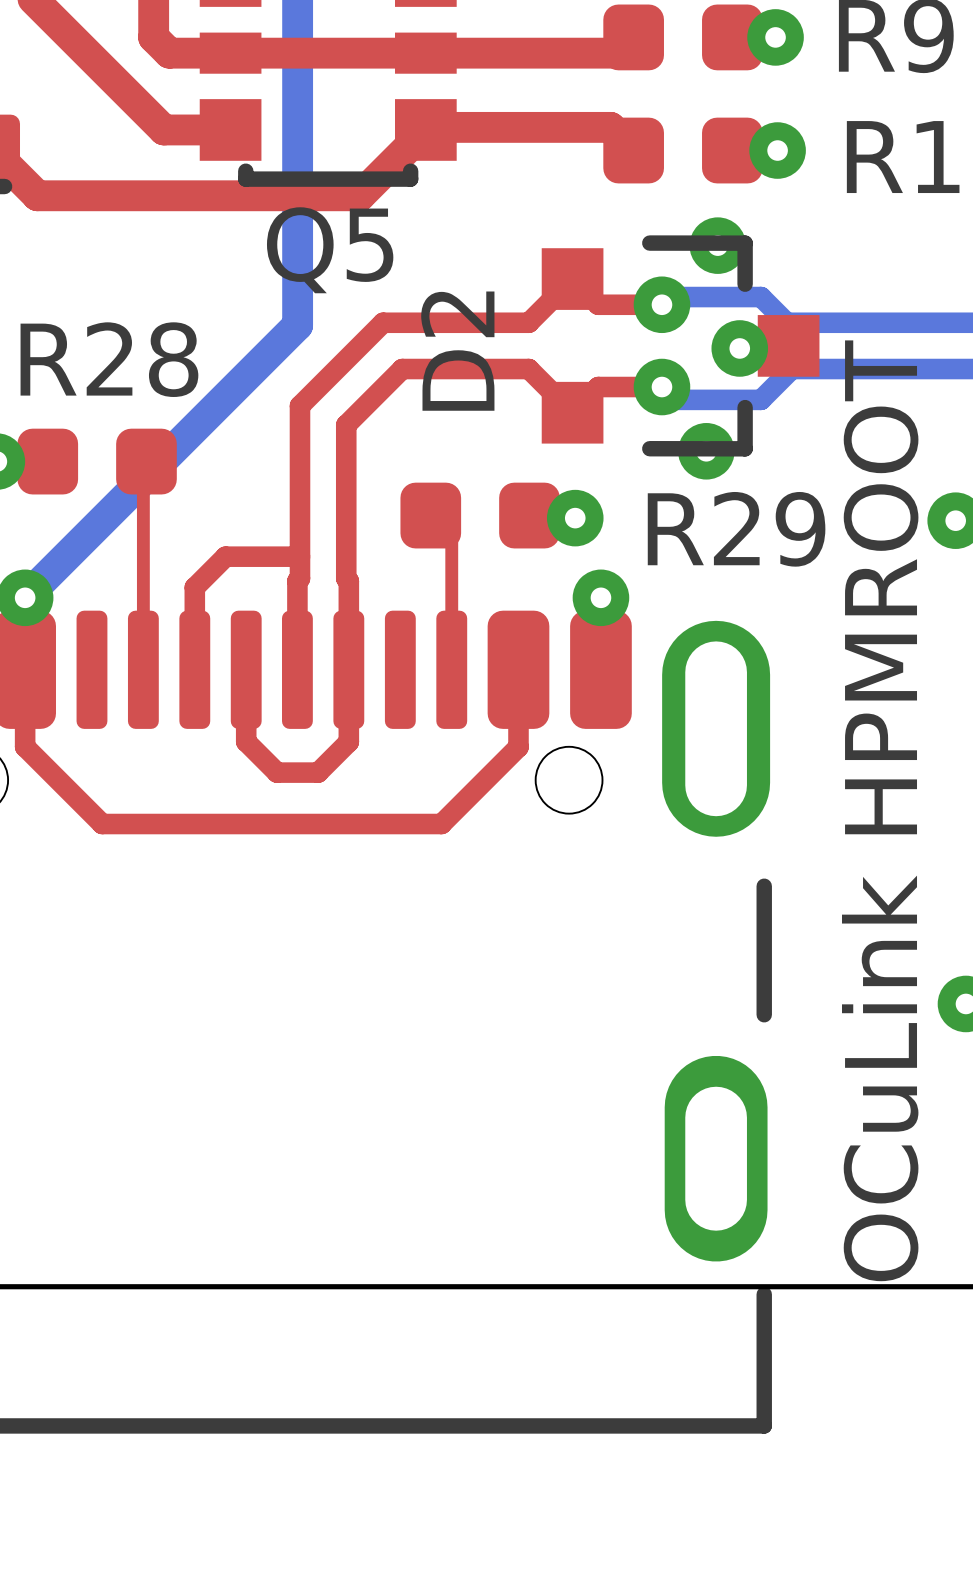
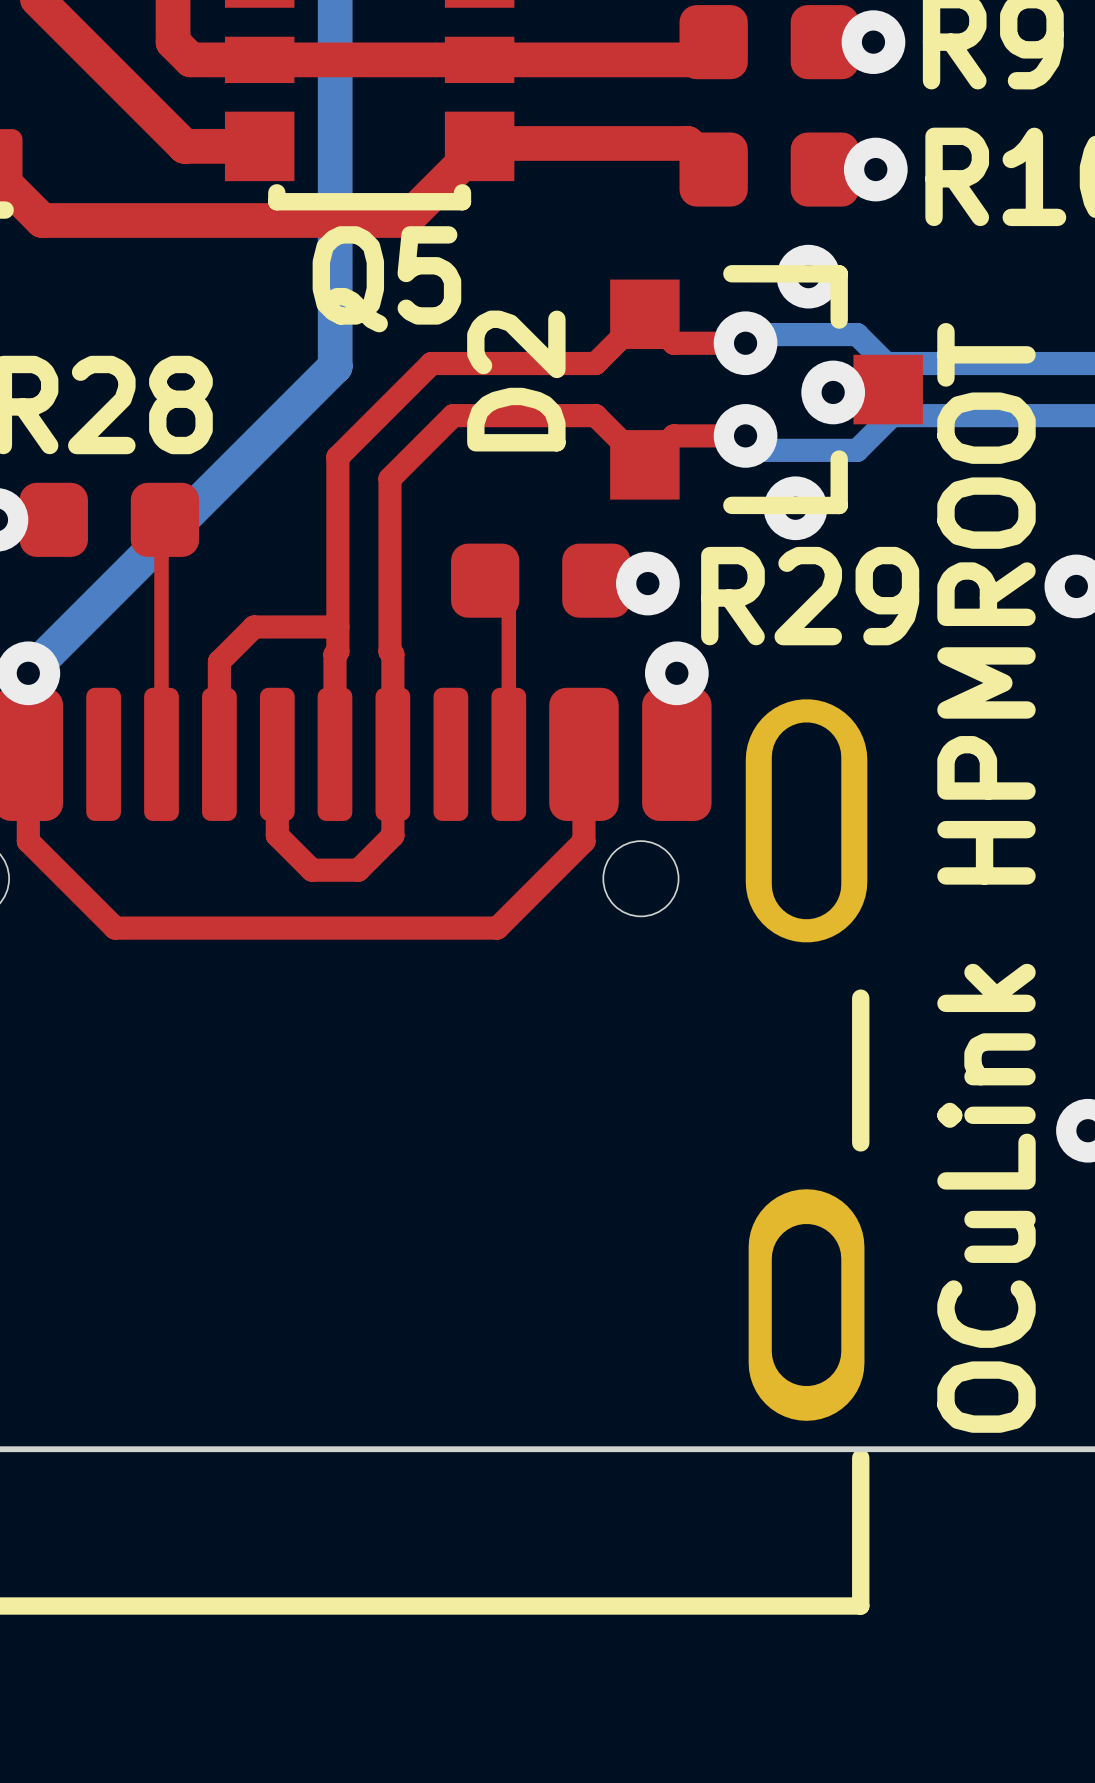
text position: OCuLink HPMROOT (880, 810) -> OCuLink HPMROOT (986, 877)

